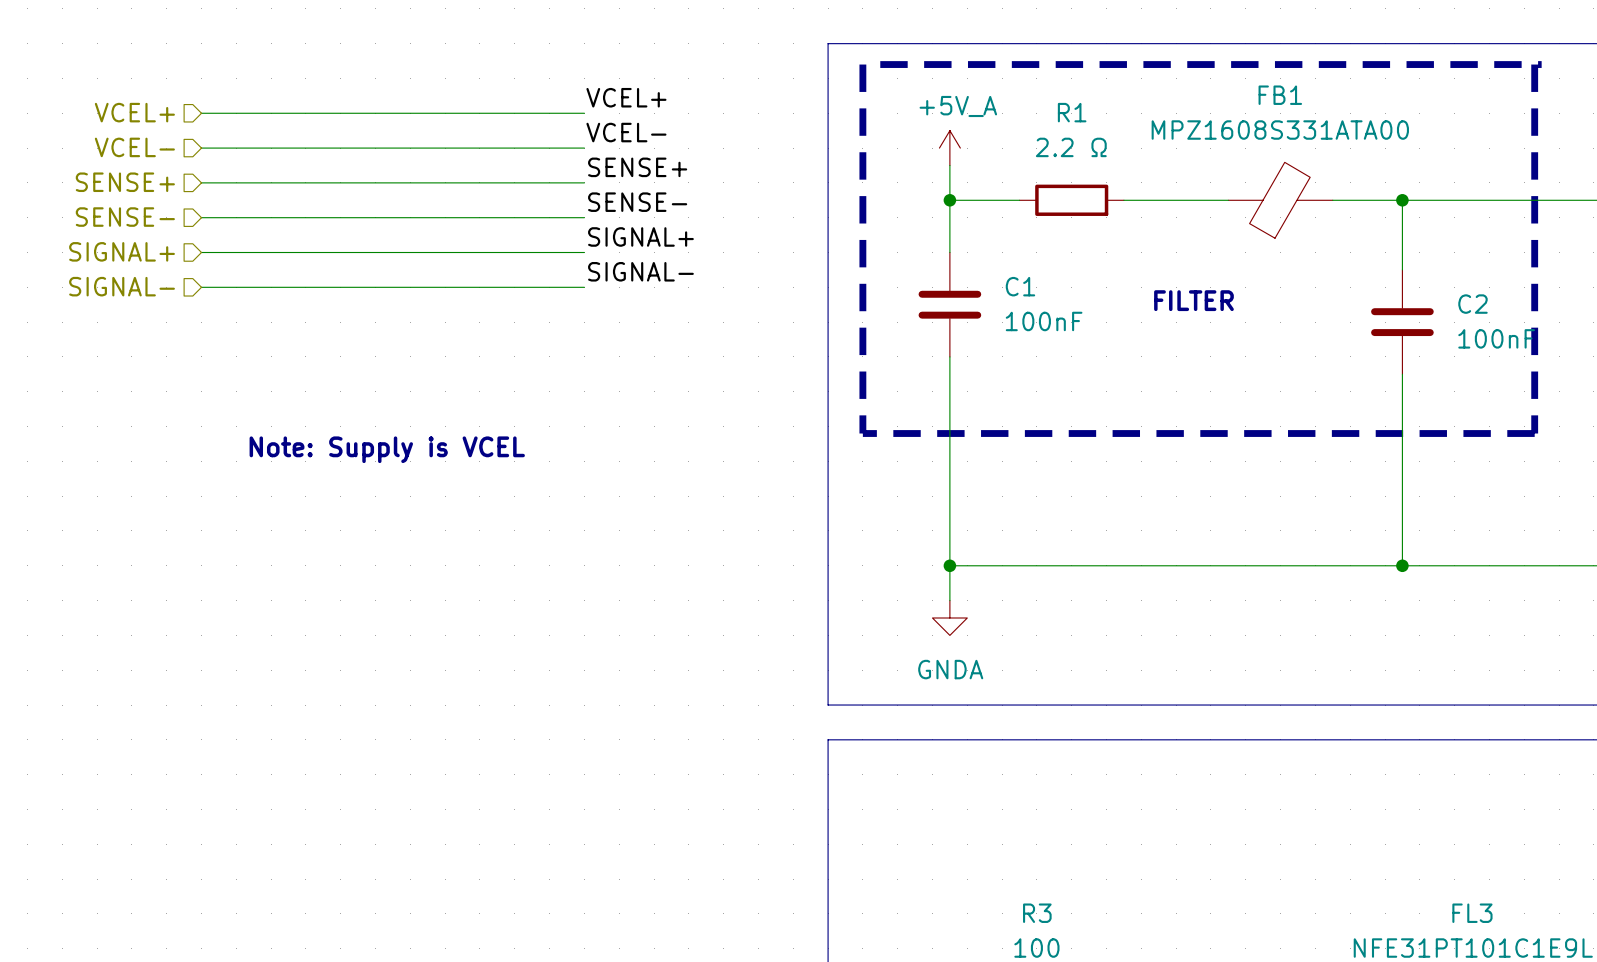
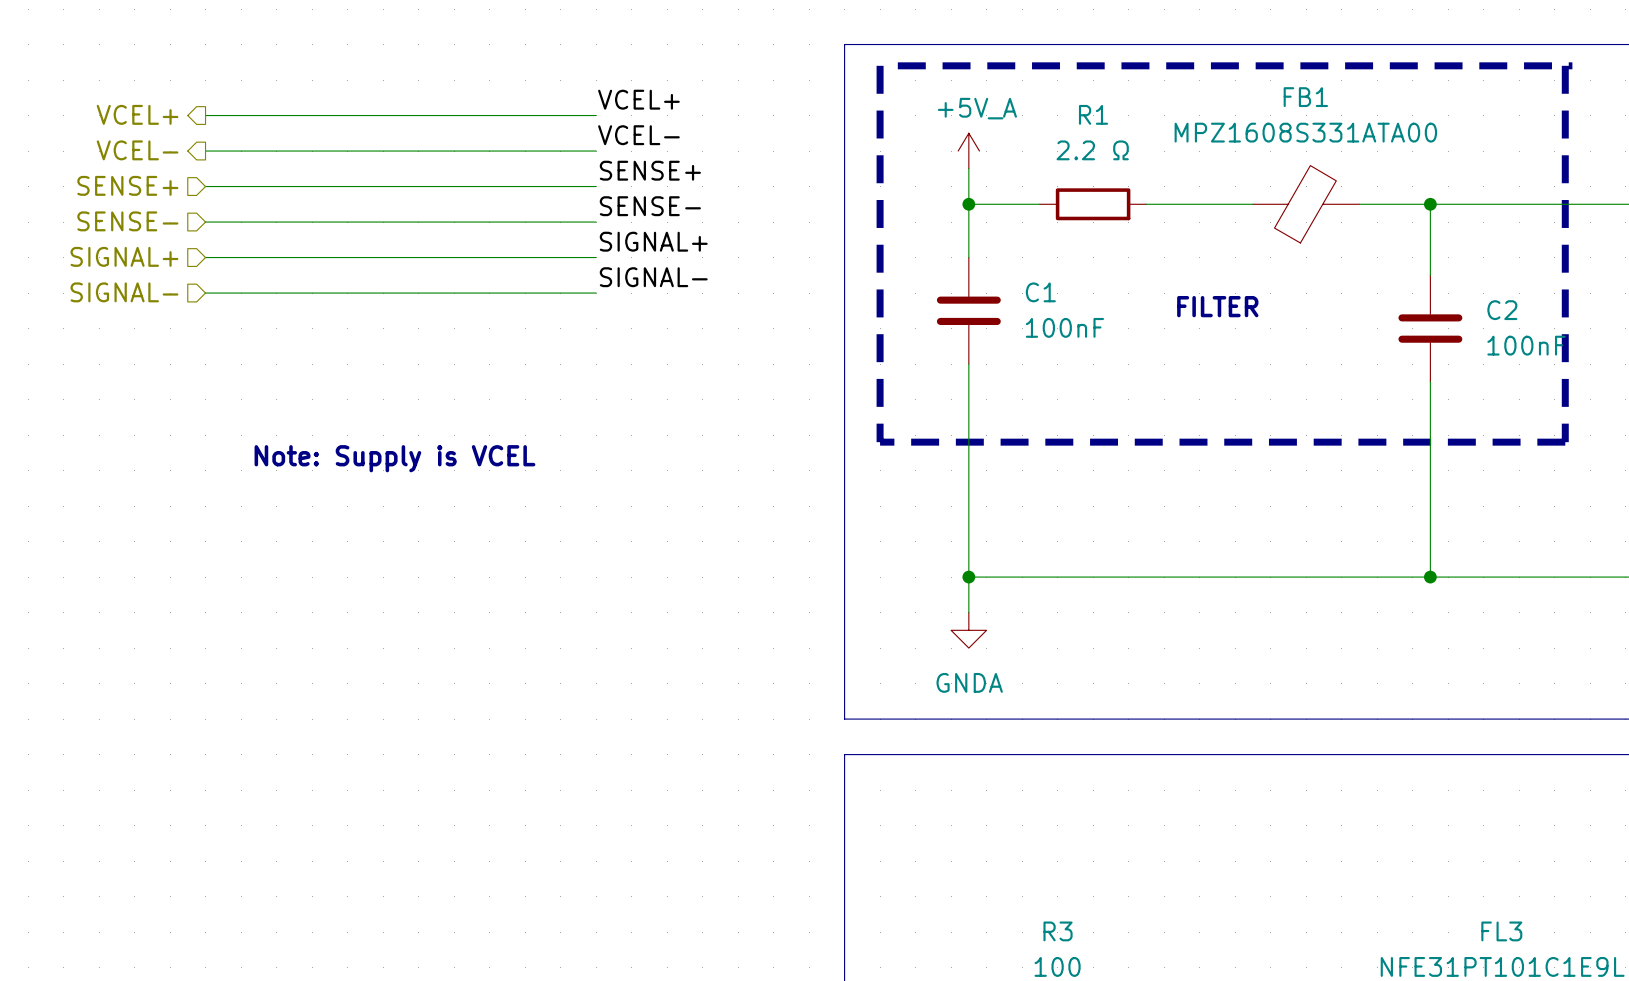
hierarchical label shape: input (134, 112) -> output (137, 114)
hierarchical label shape: input (134, 147) -> output (137, 150)

